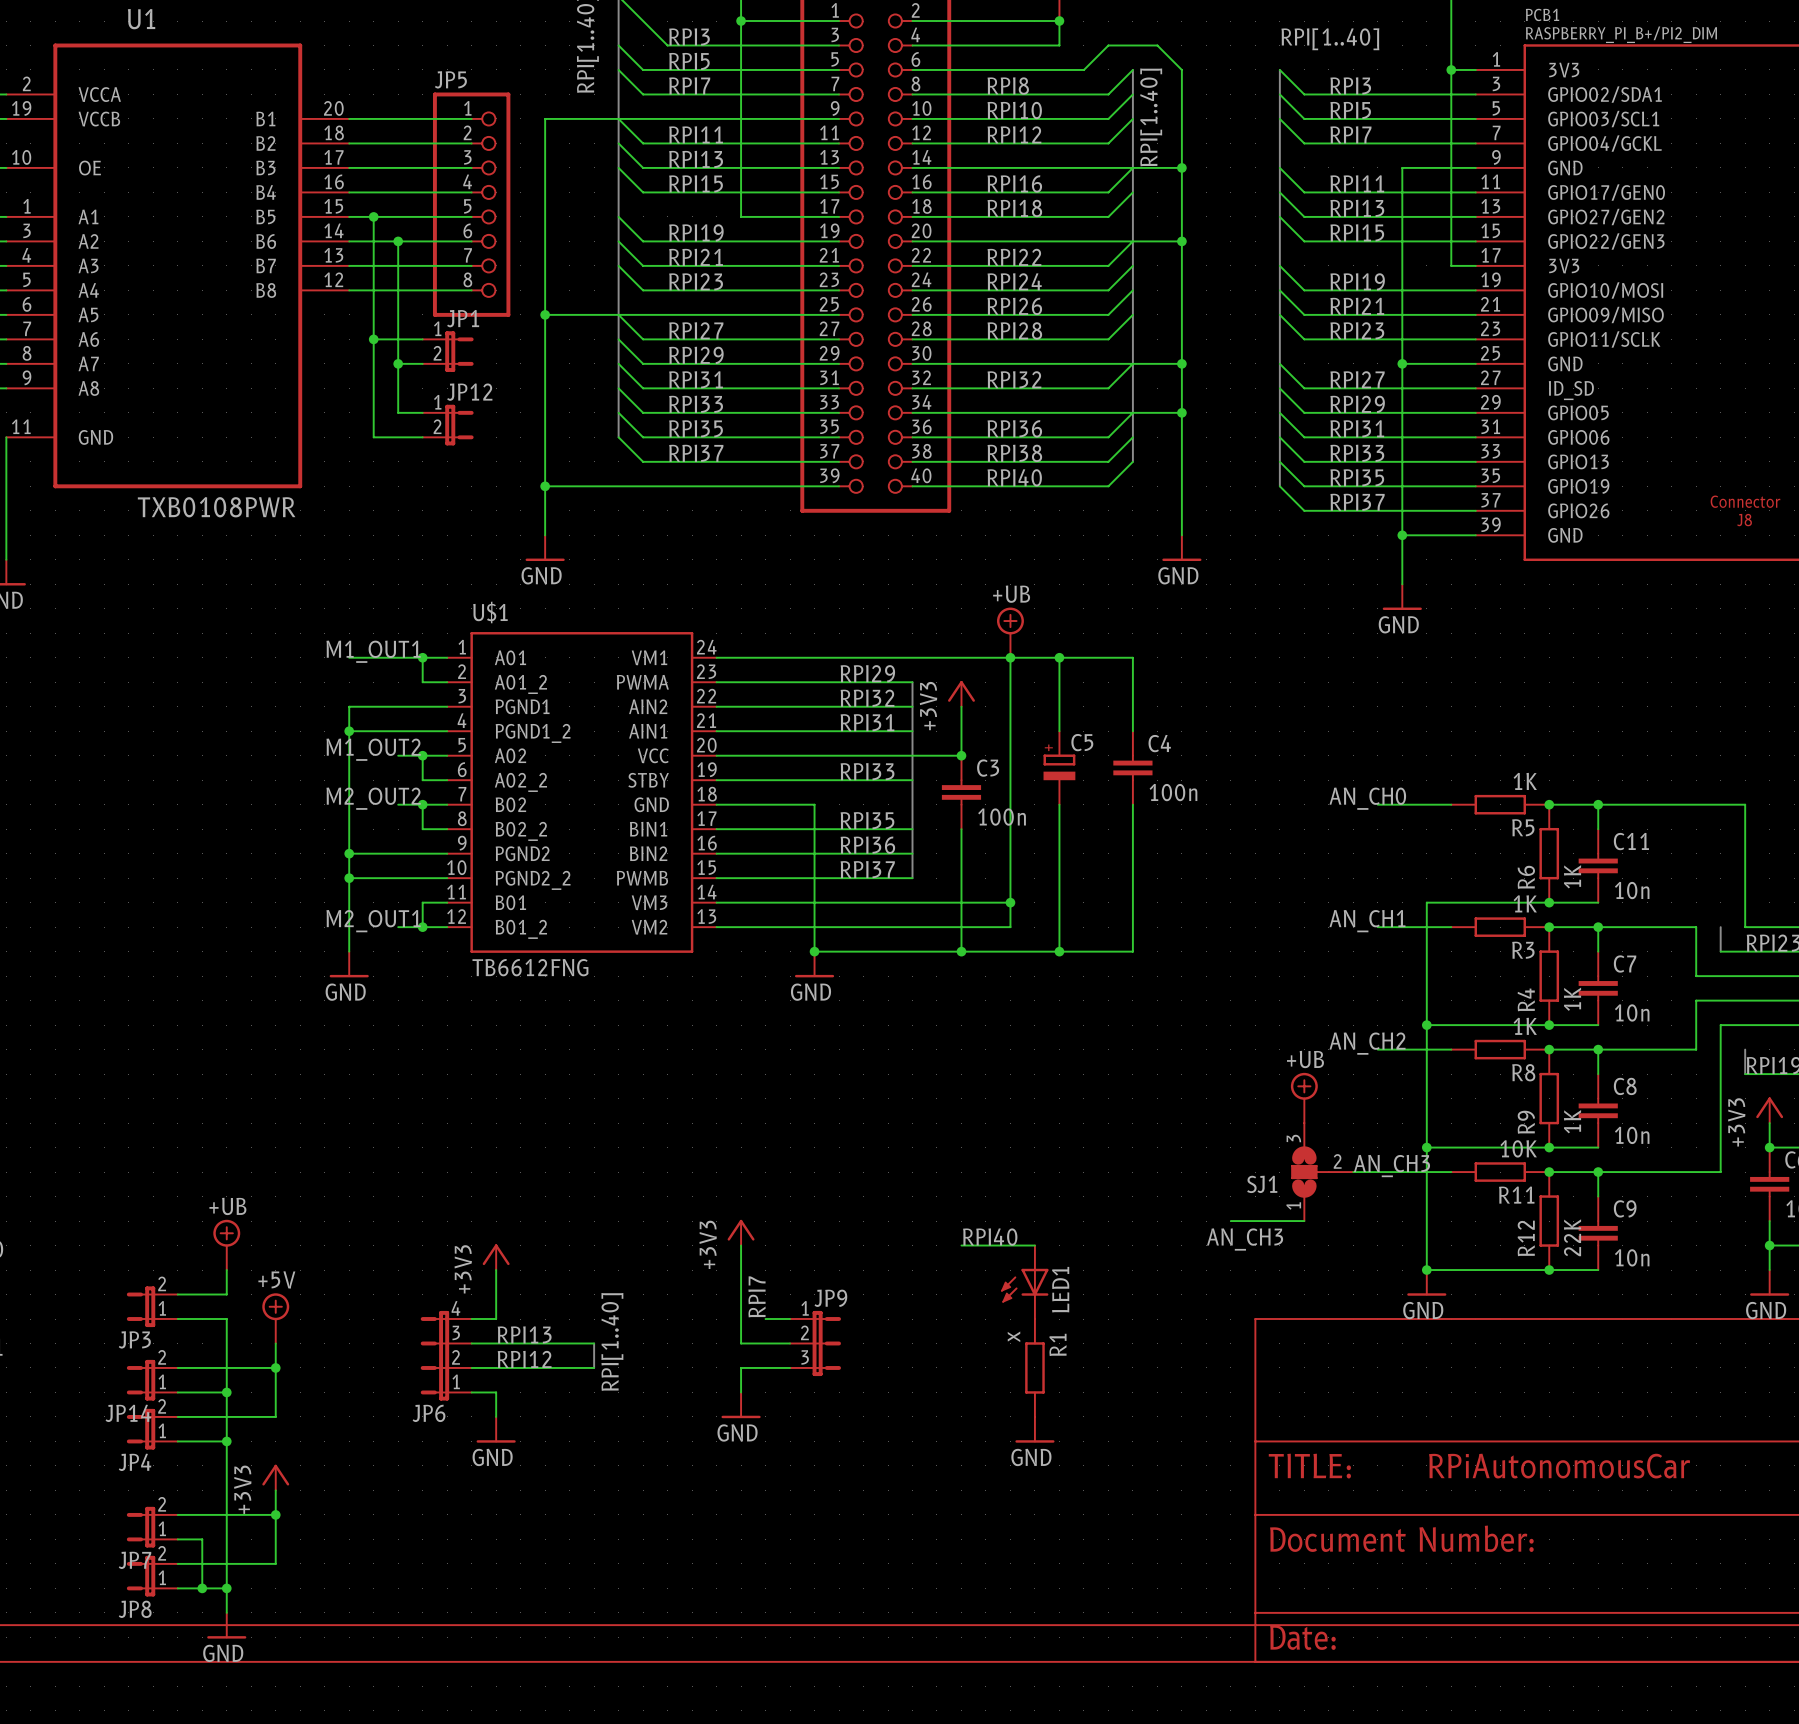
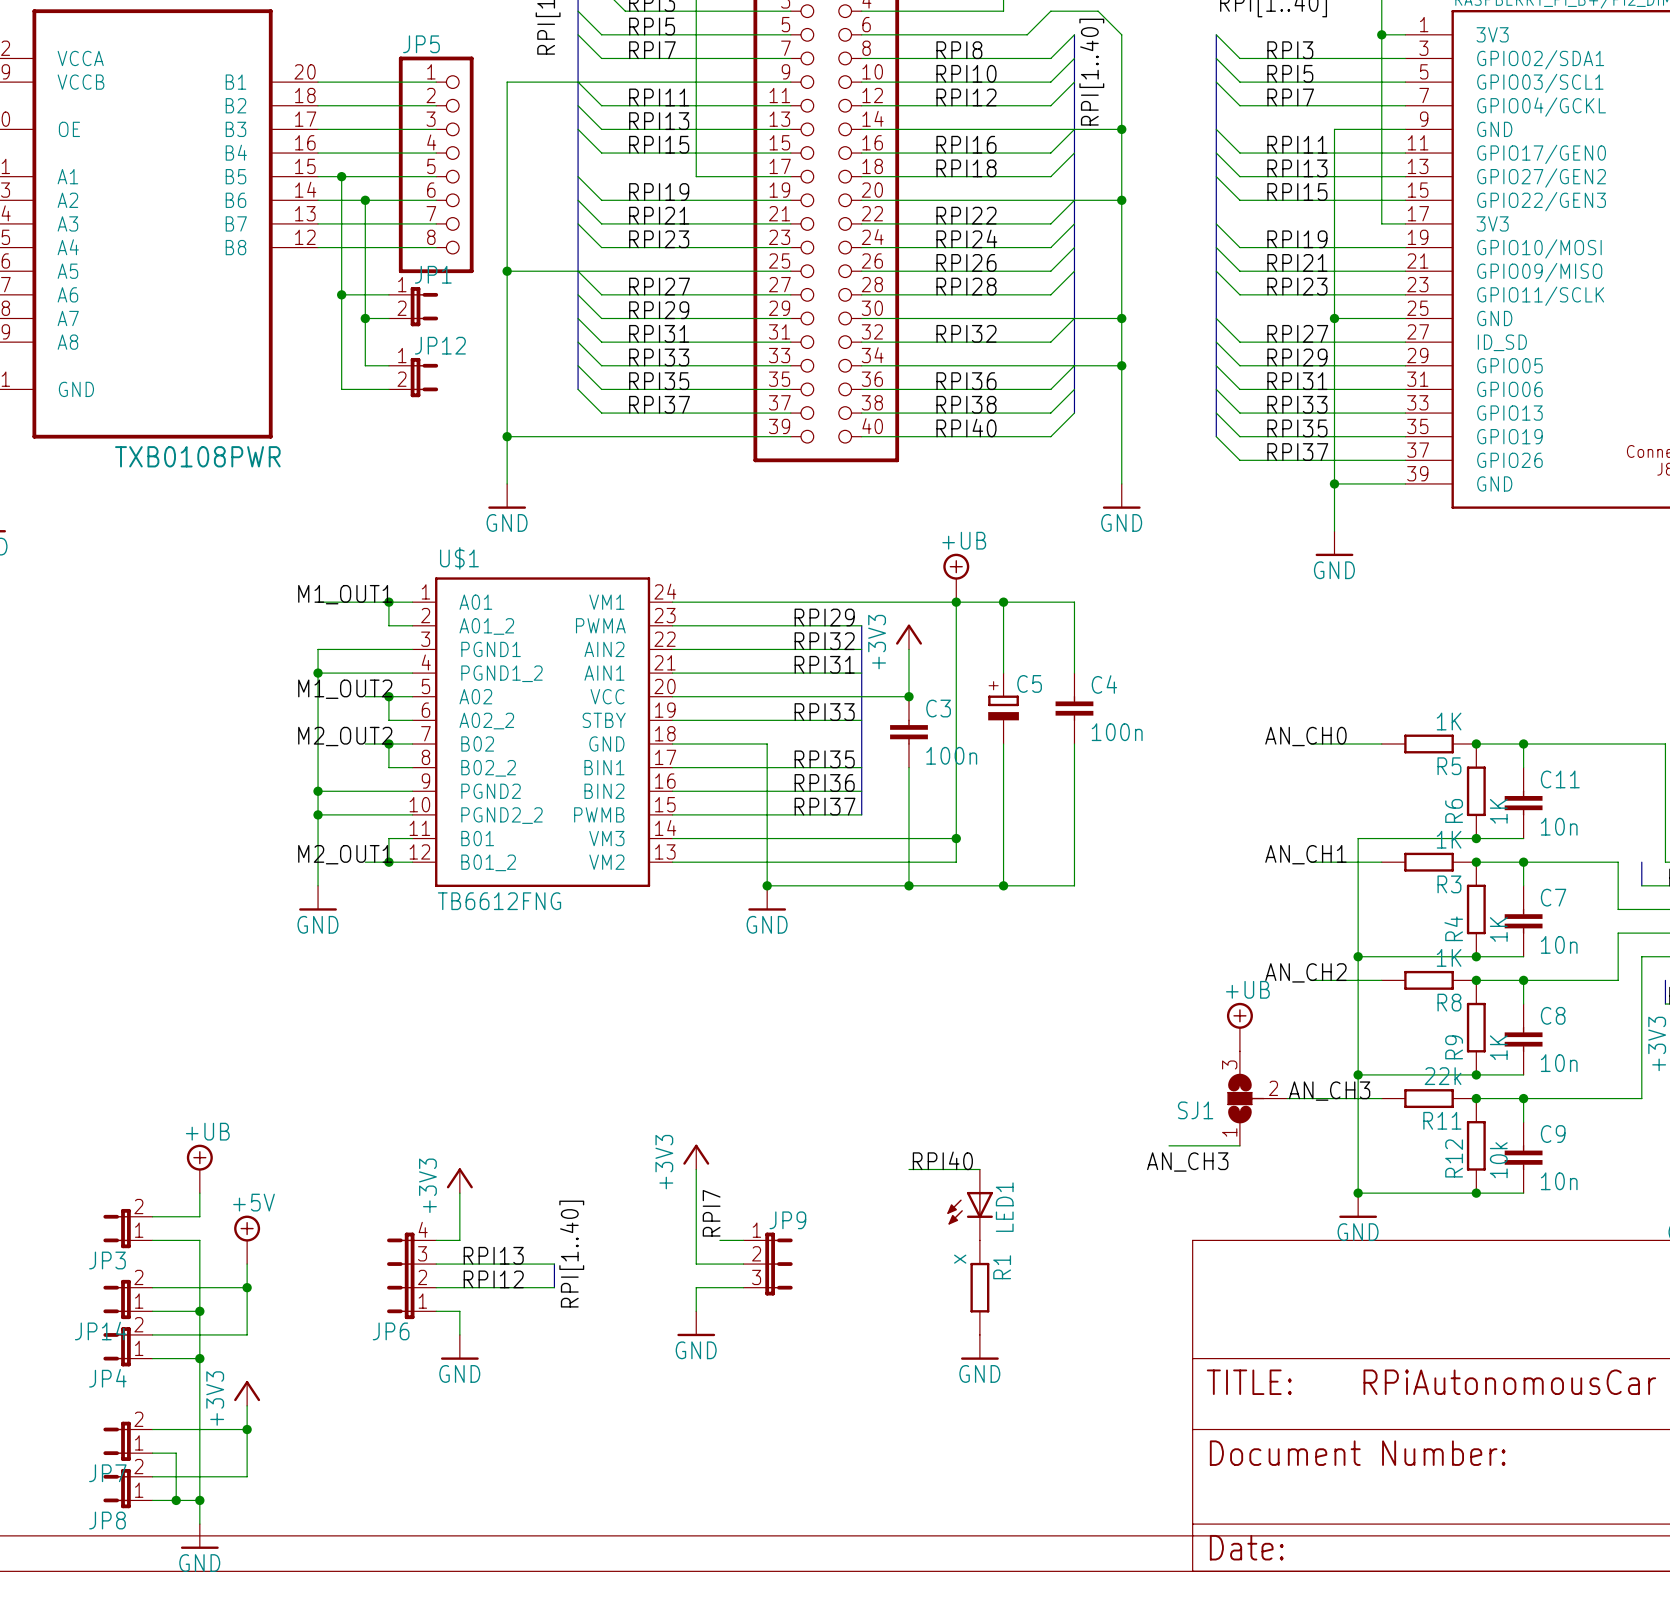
R11 value: 10K (1518, 1148) -> 22k (1443, 1076)
R12 value: 22K (1572, 1237) -> 10k (1498, 1160)

